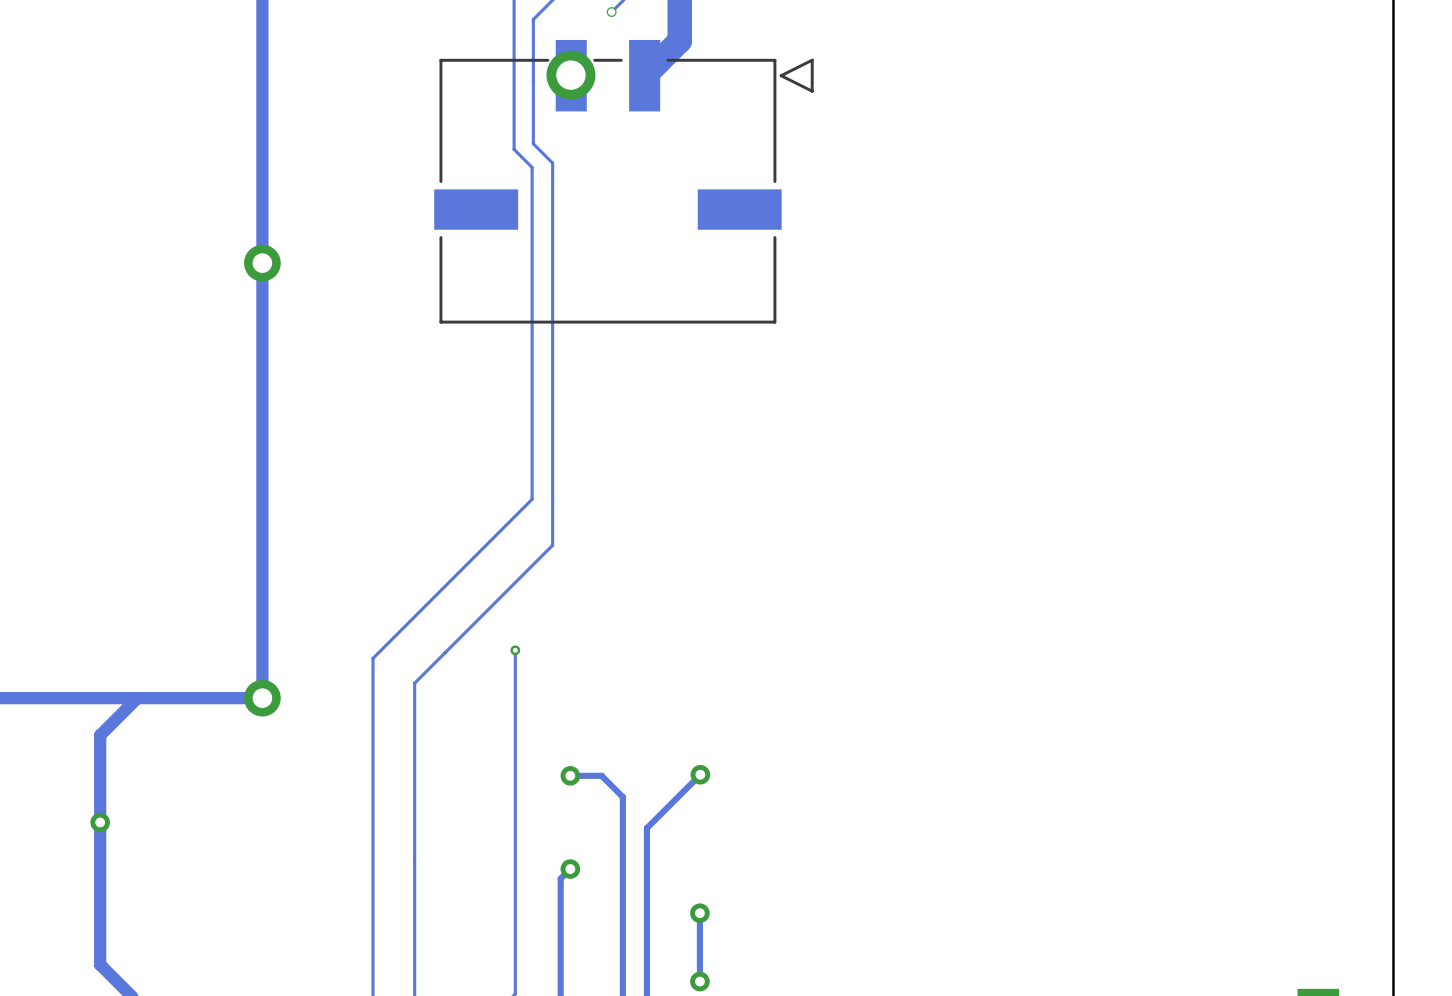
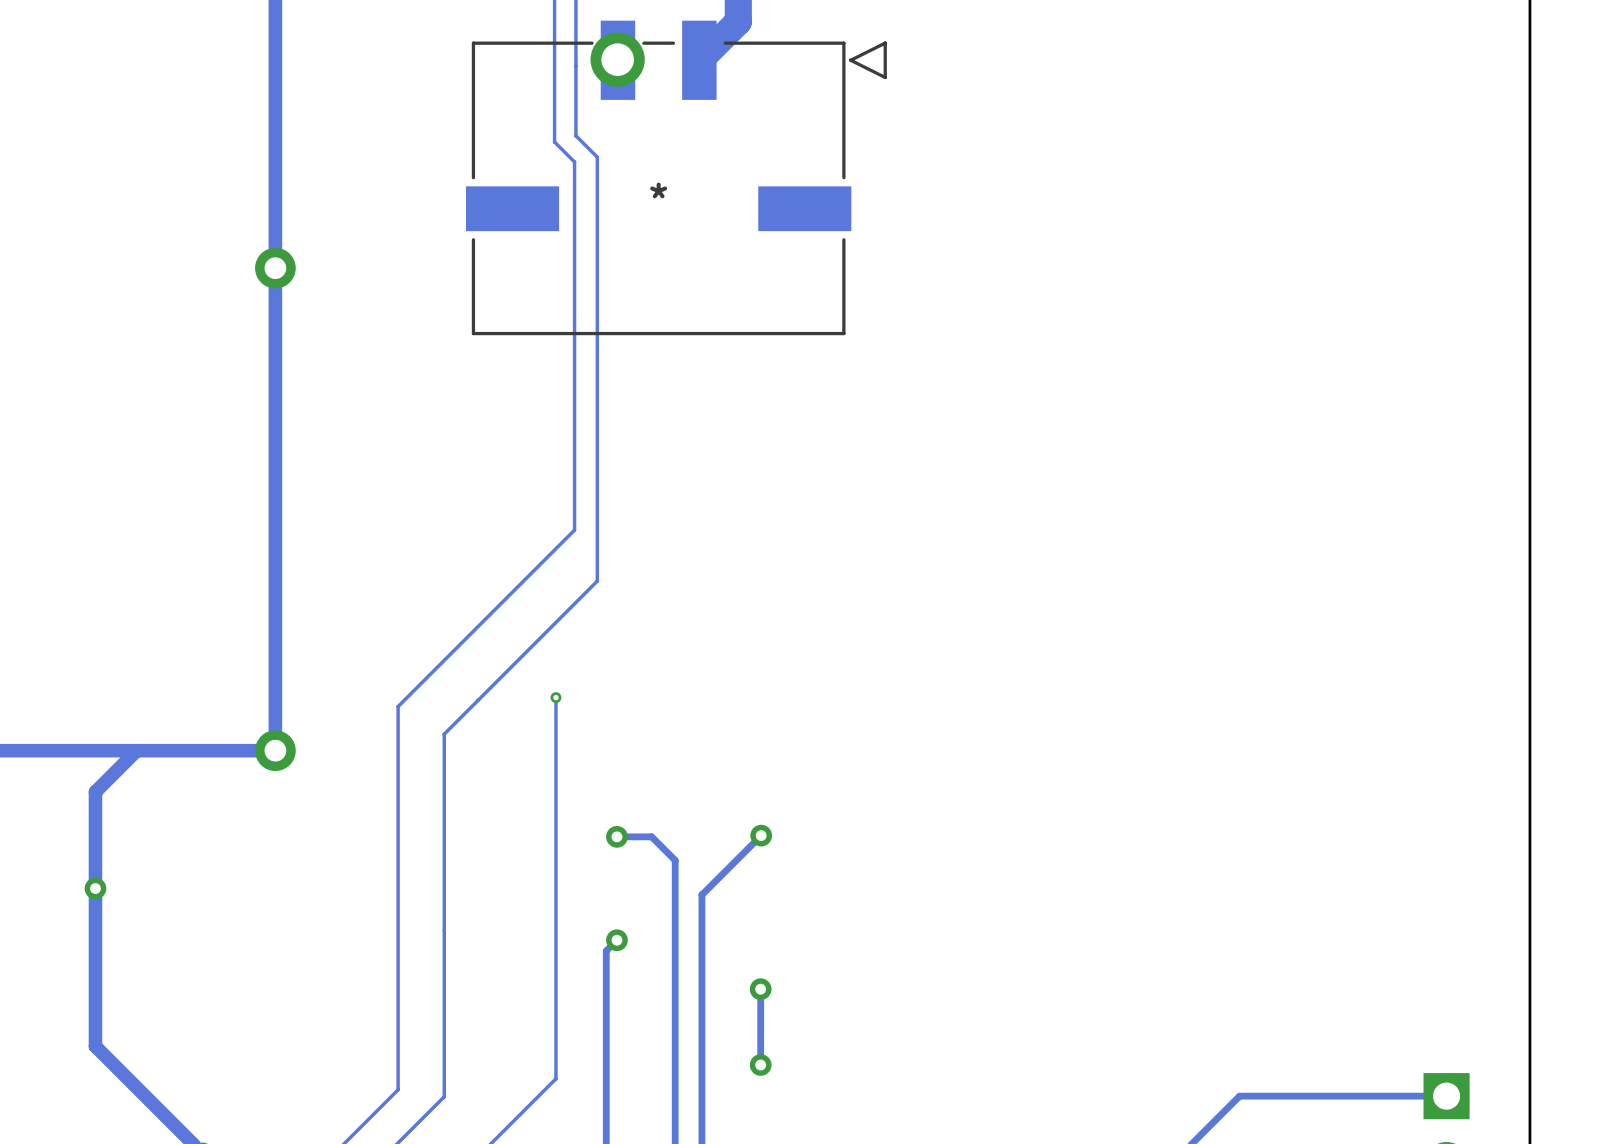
part text: none -> * (658, 190)

